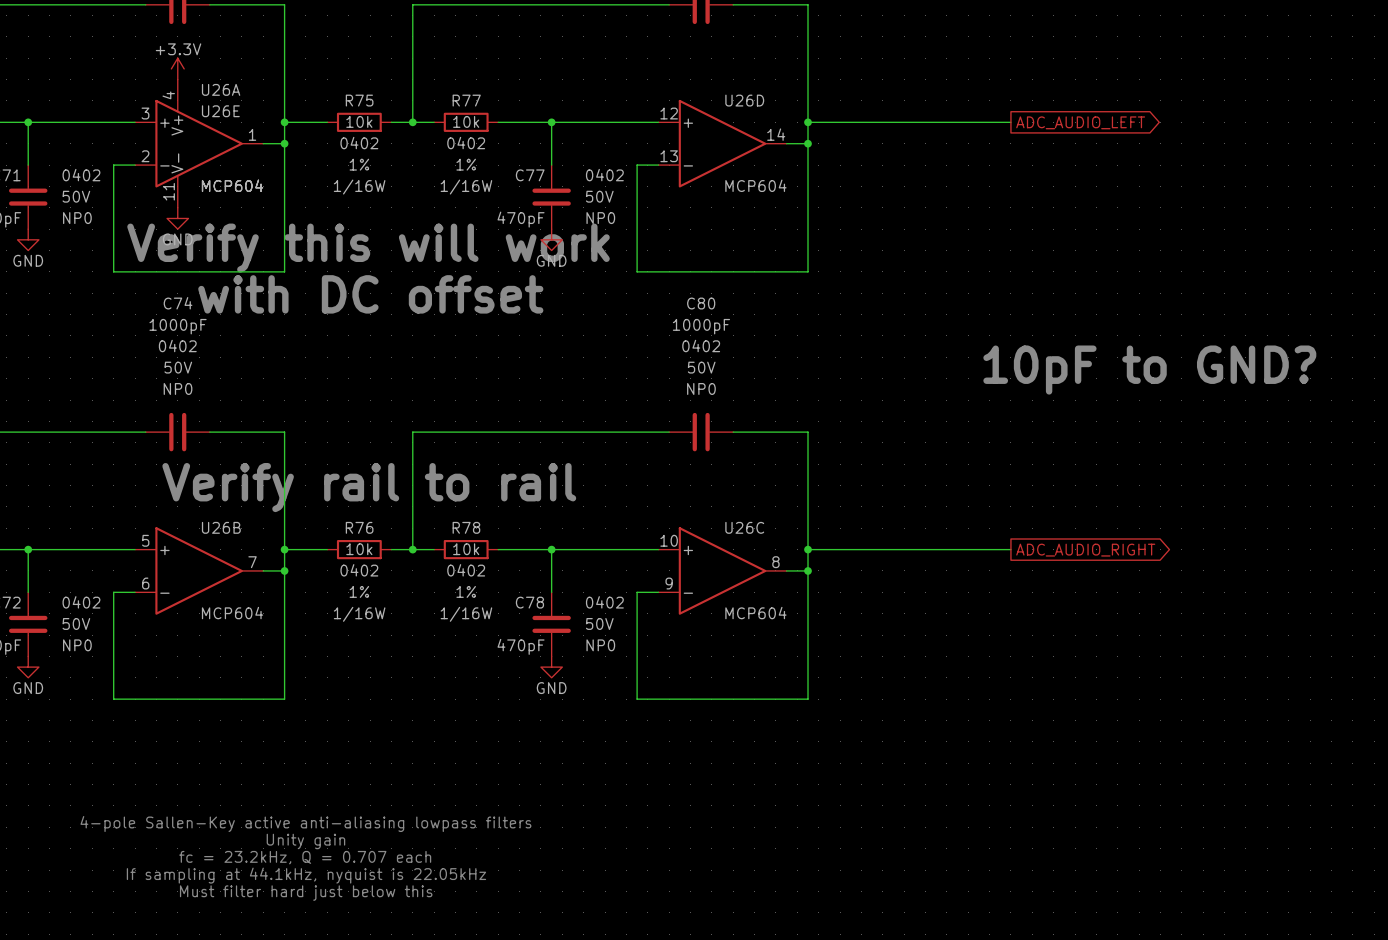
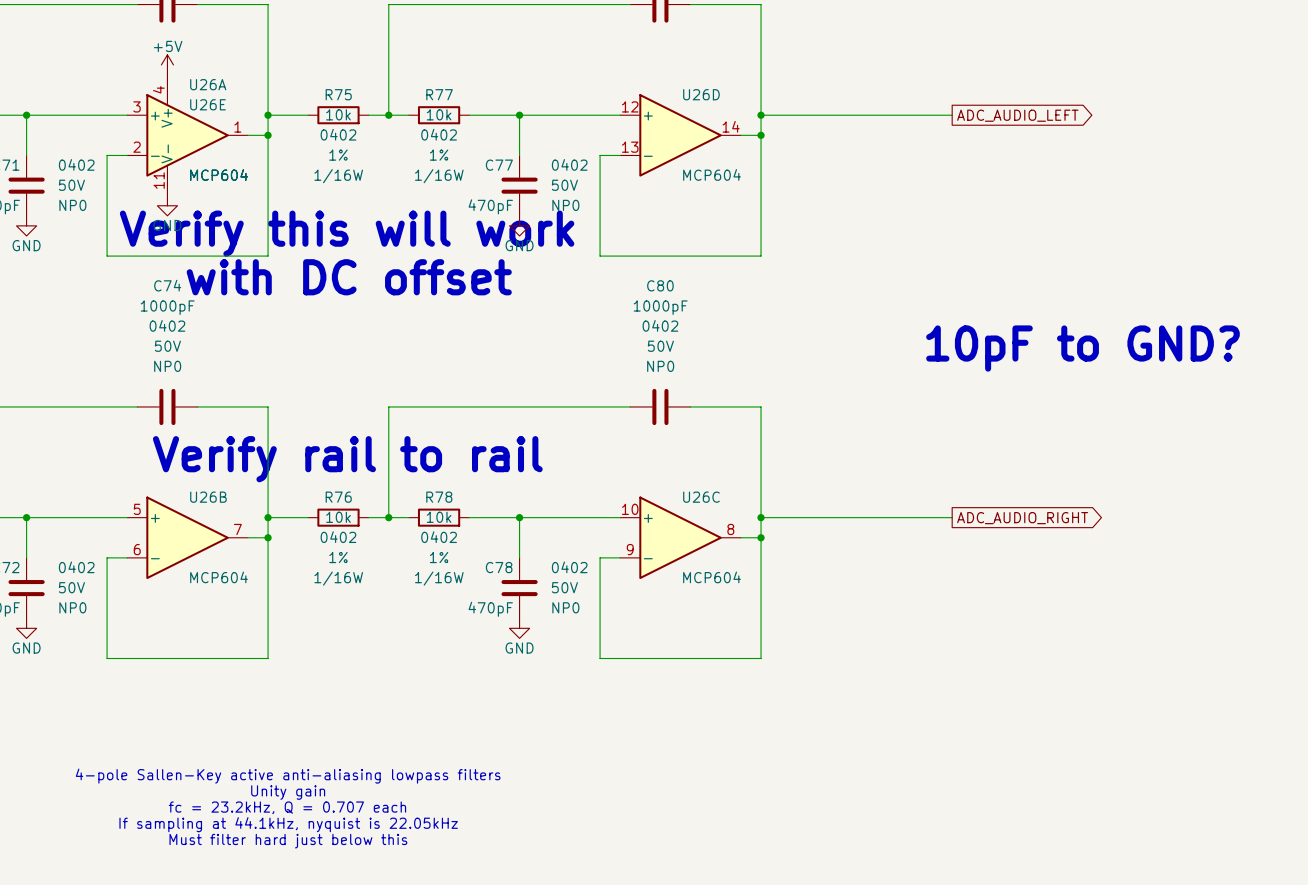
power symbol: +3.3V (177, 68) -> +5V (167, 64)

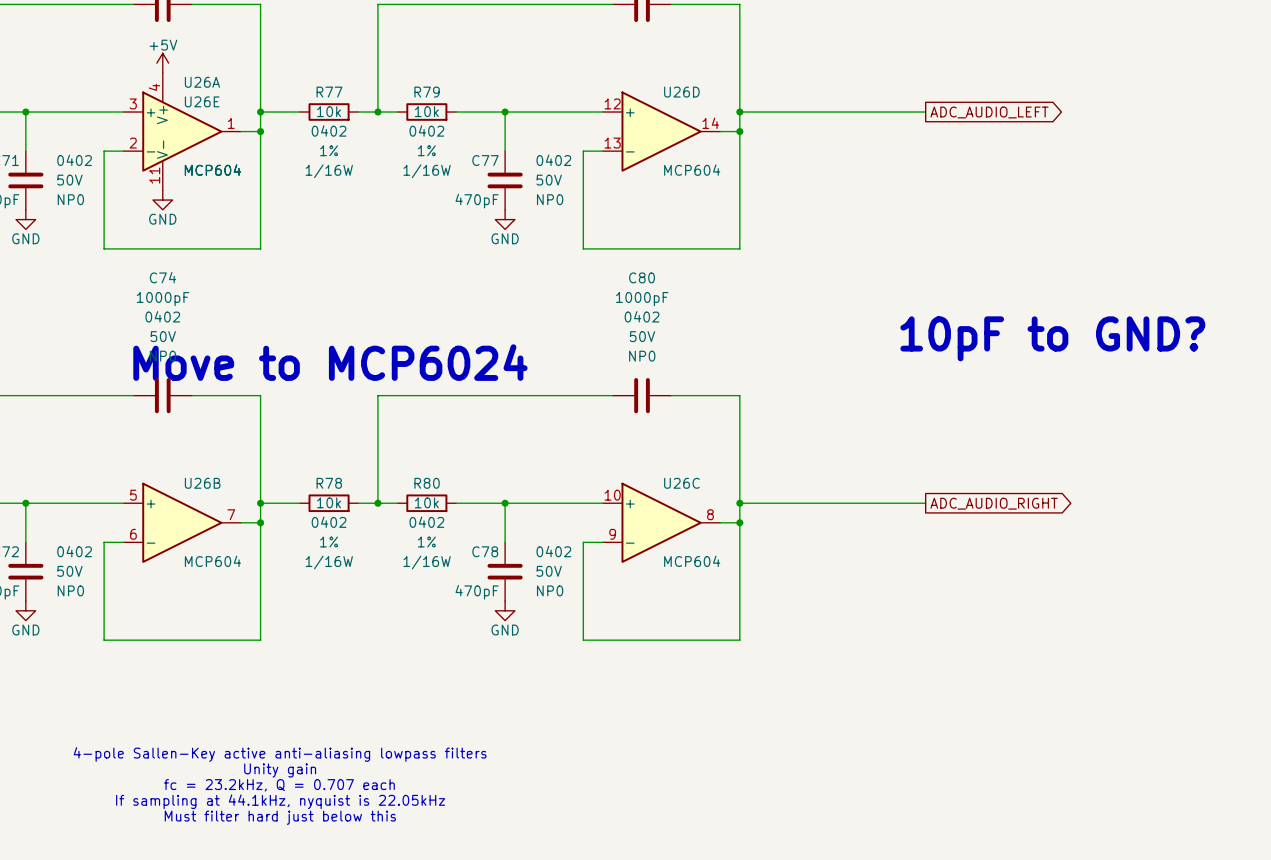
R75 name: R75 (338, 94) -> R77 (329, 92)
R77 name: R77 (439, 94) -> R79 (427, 92)
text: Verify this will work (347, 233) -> none
text: with DC offset (349, 277) -> none
text: none -> Move to MCP6024 (330, 362)
text: Verify rail to rail (347, 459) -> none
R76 name: R76 (338, 497) -> R78 (329, 483)
R78 name: R78 (439, 497) -> R80 (427, 483)

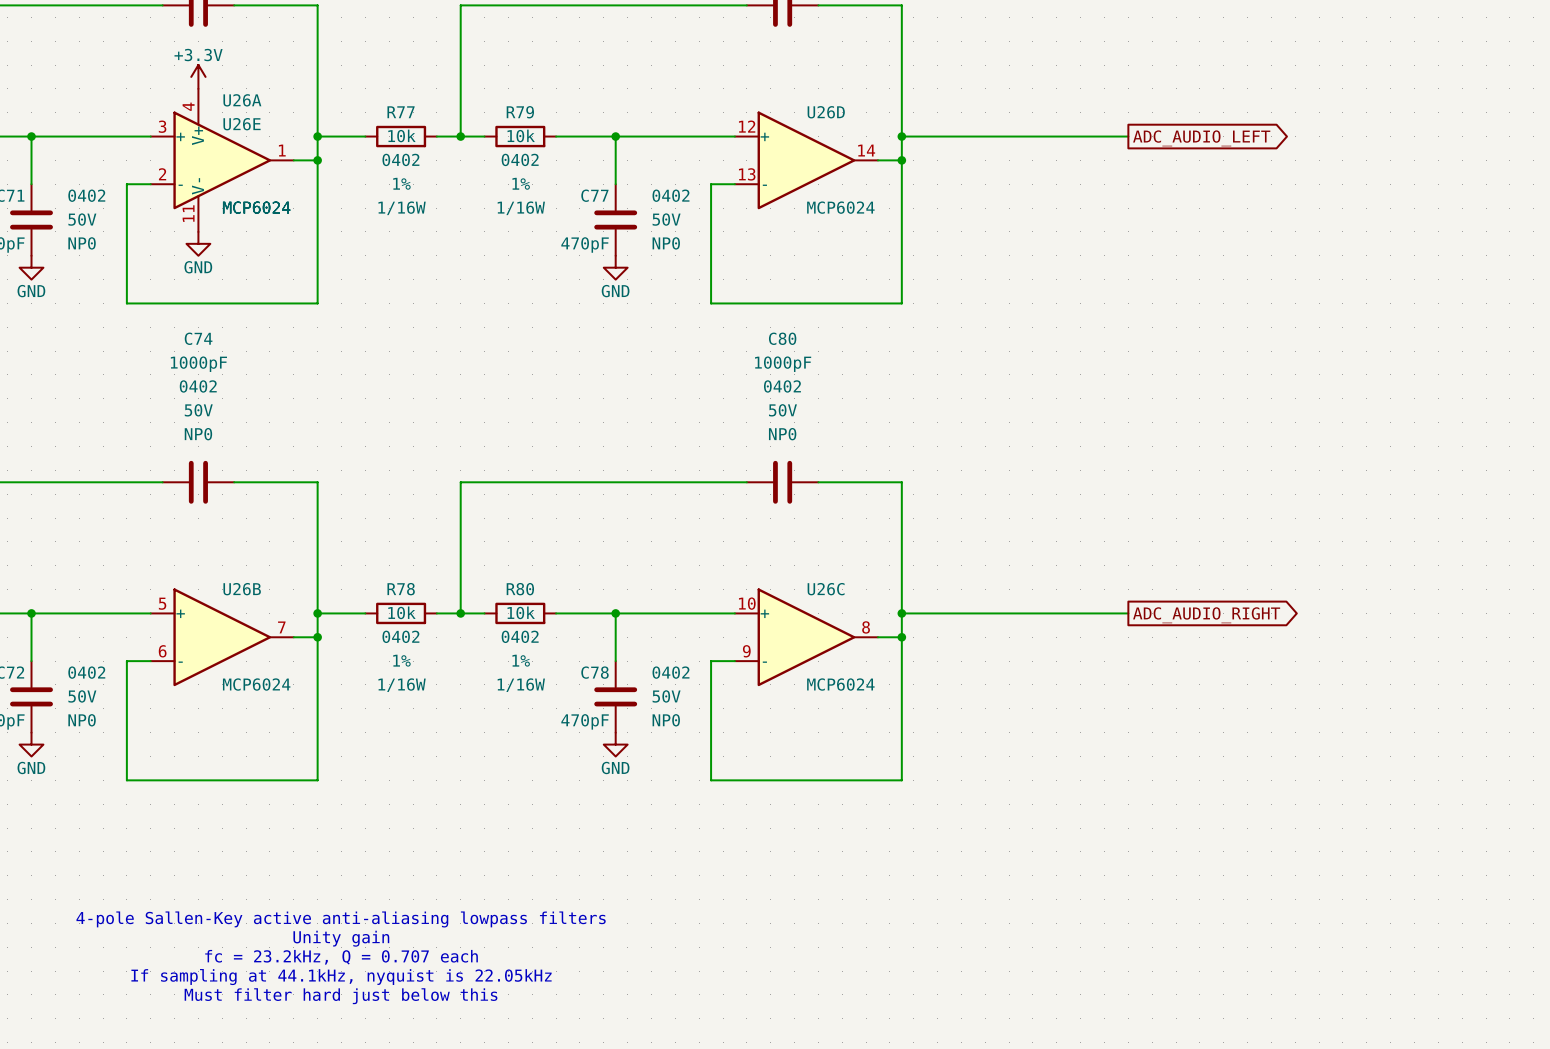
power symbol: +5V (162, 63) -> +3.3V (198, 76)
U26A value: MCP604 (212, 170) -> MCP6024 (256, 207)
U26E value: MCP604 (212, 170) -> MCP6024 (256, 207)
U26D value: MCP604 (692, 170) -> MCP6024 (840, 207)
text: 10pF to GND? (1052, 338) -> none
text: Move to MCP6024 (330, 362) -> none
U26B value: MCP604 (212, 561) -> MCP6024 (256, 684)
U26C value: MCP604 (692, 561) -> MCP6024 (840, 684)

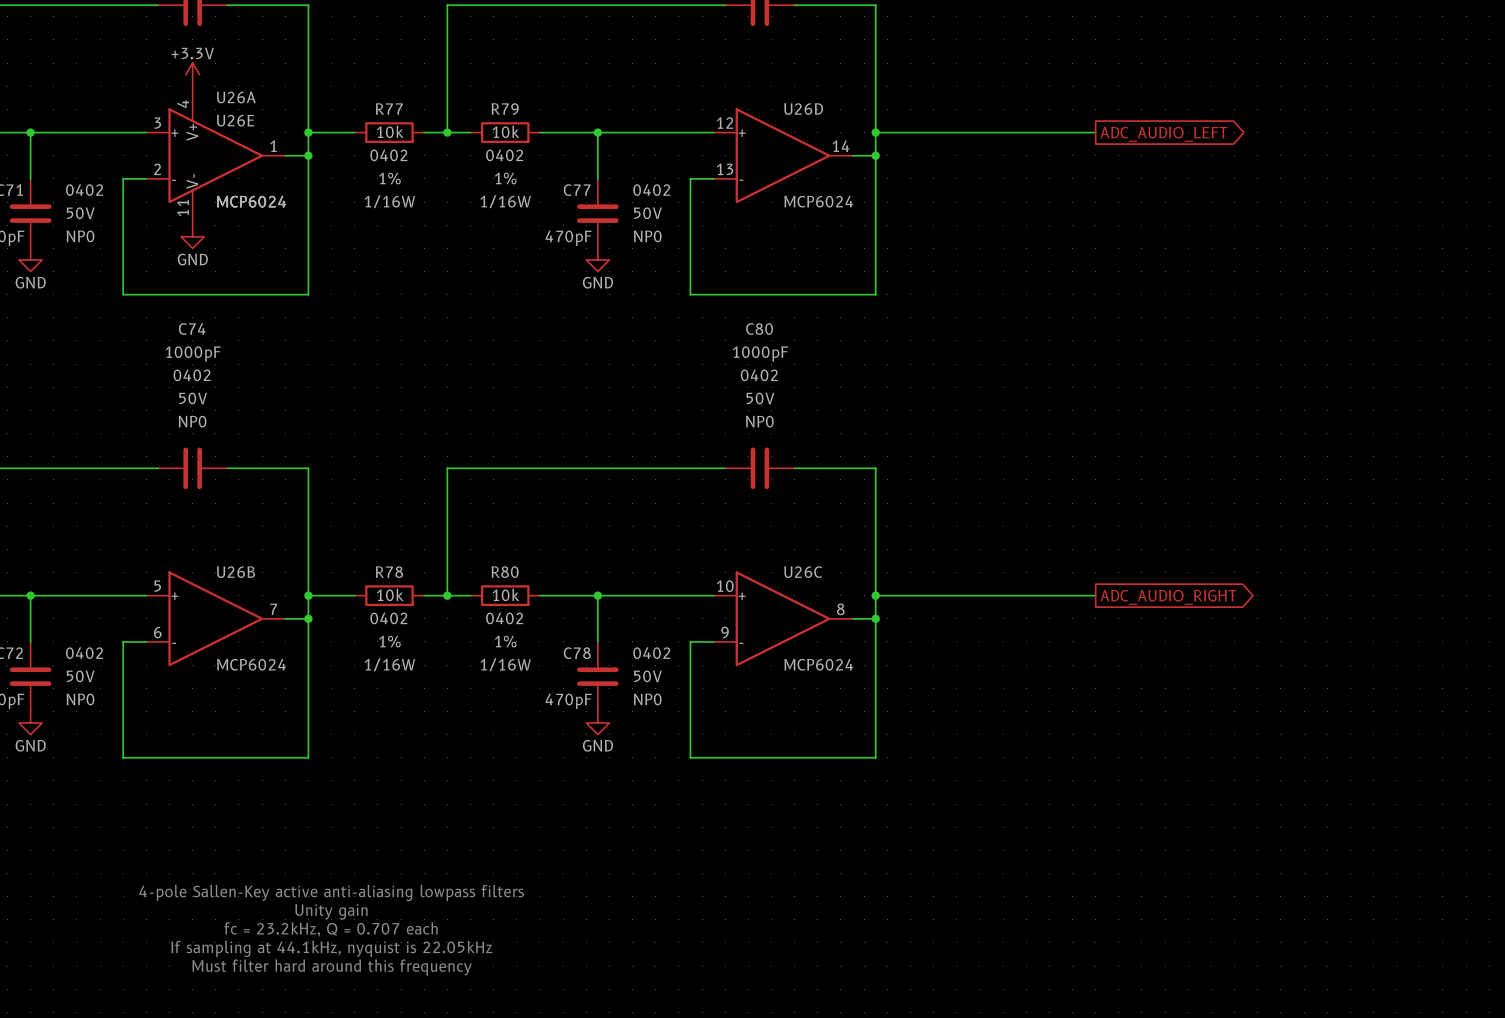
text: Must filter hard just below this (341, 996) -> Must filter hard around this frequency (332, 967)

